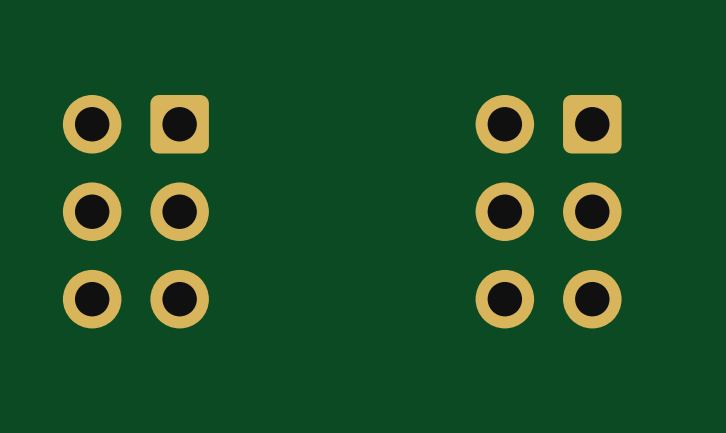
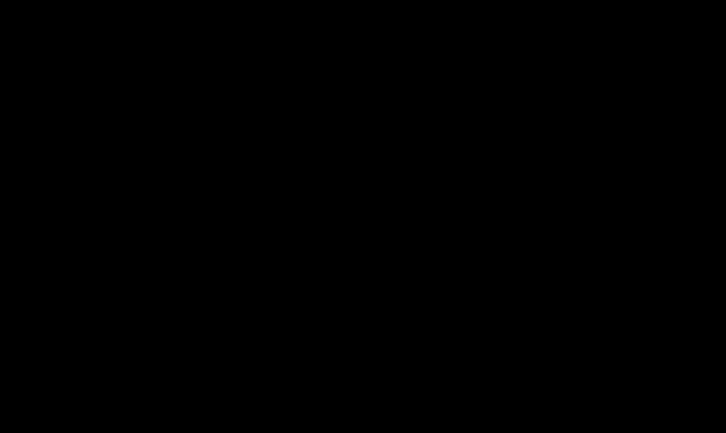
part: (135, 211) -> none
part: (548, 211) -> none

